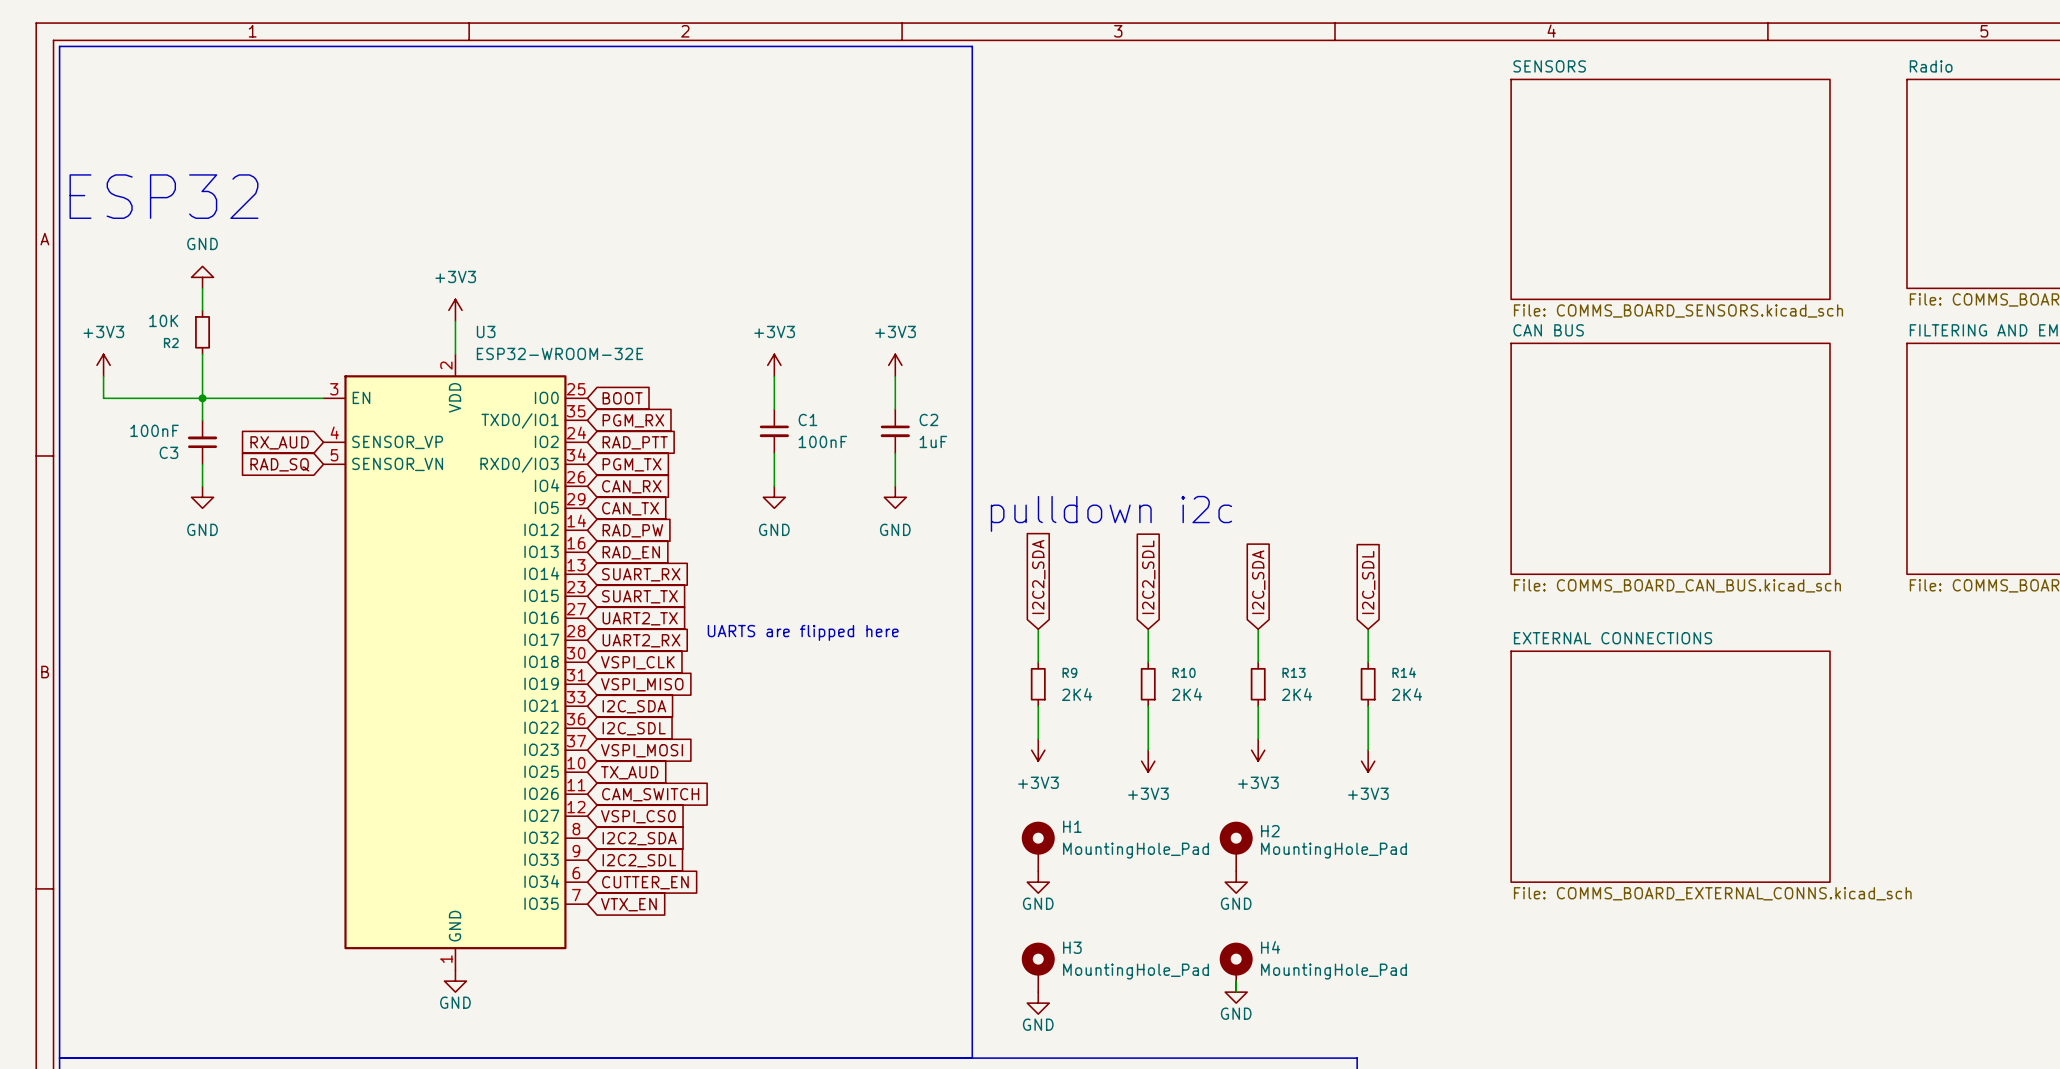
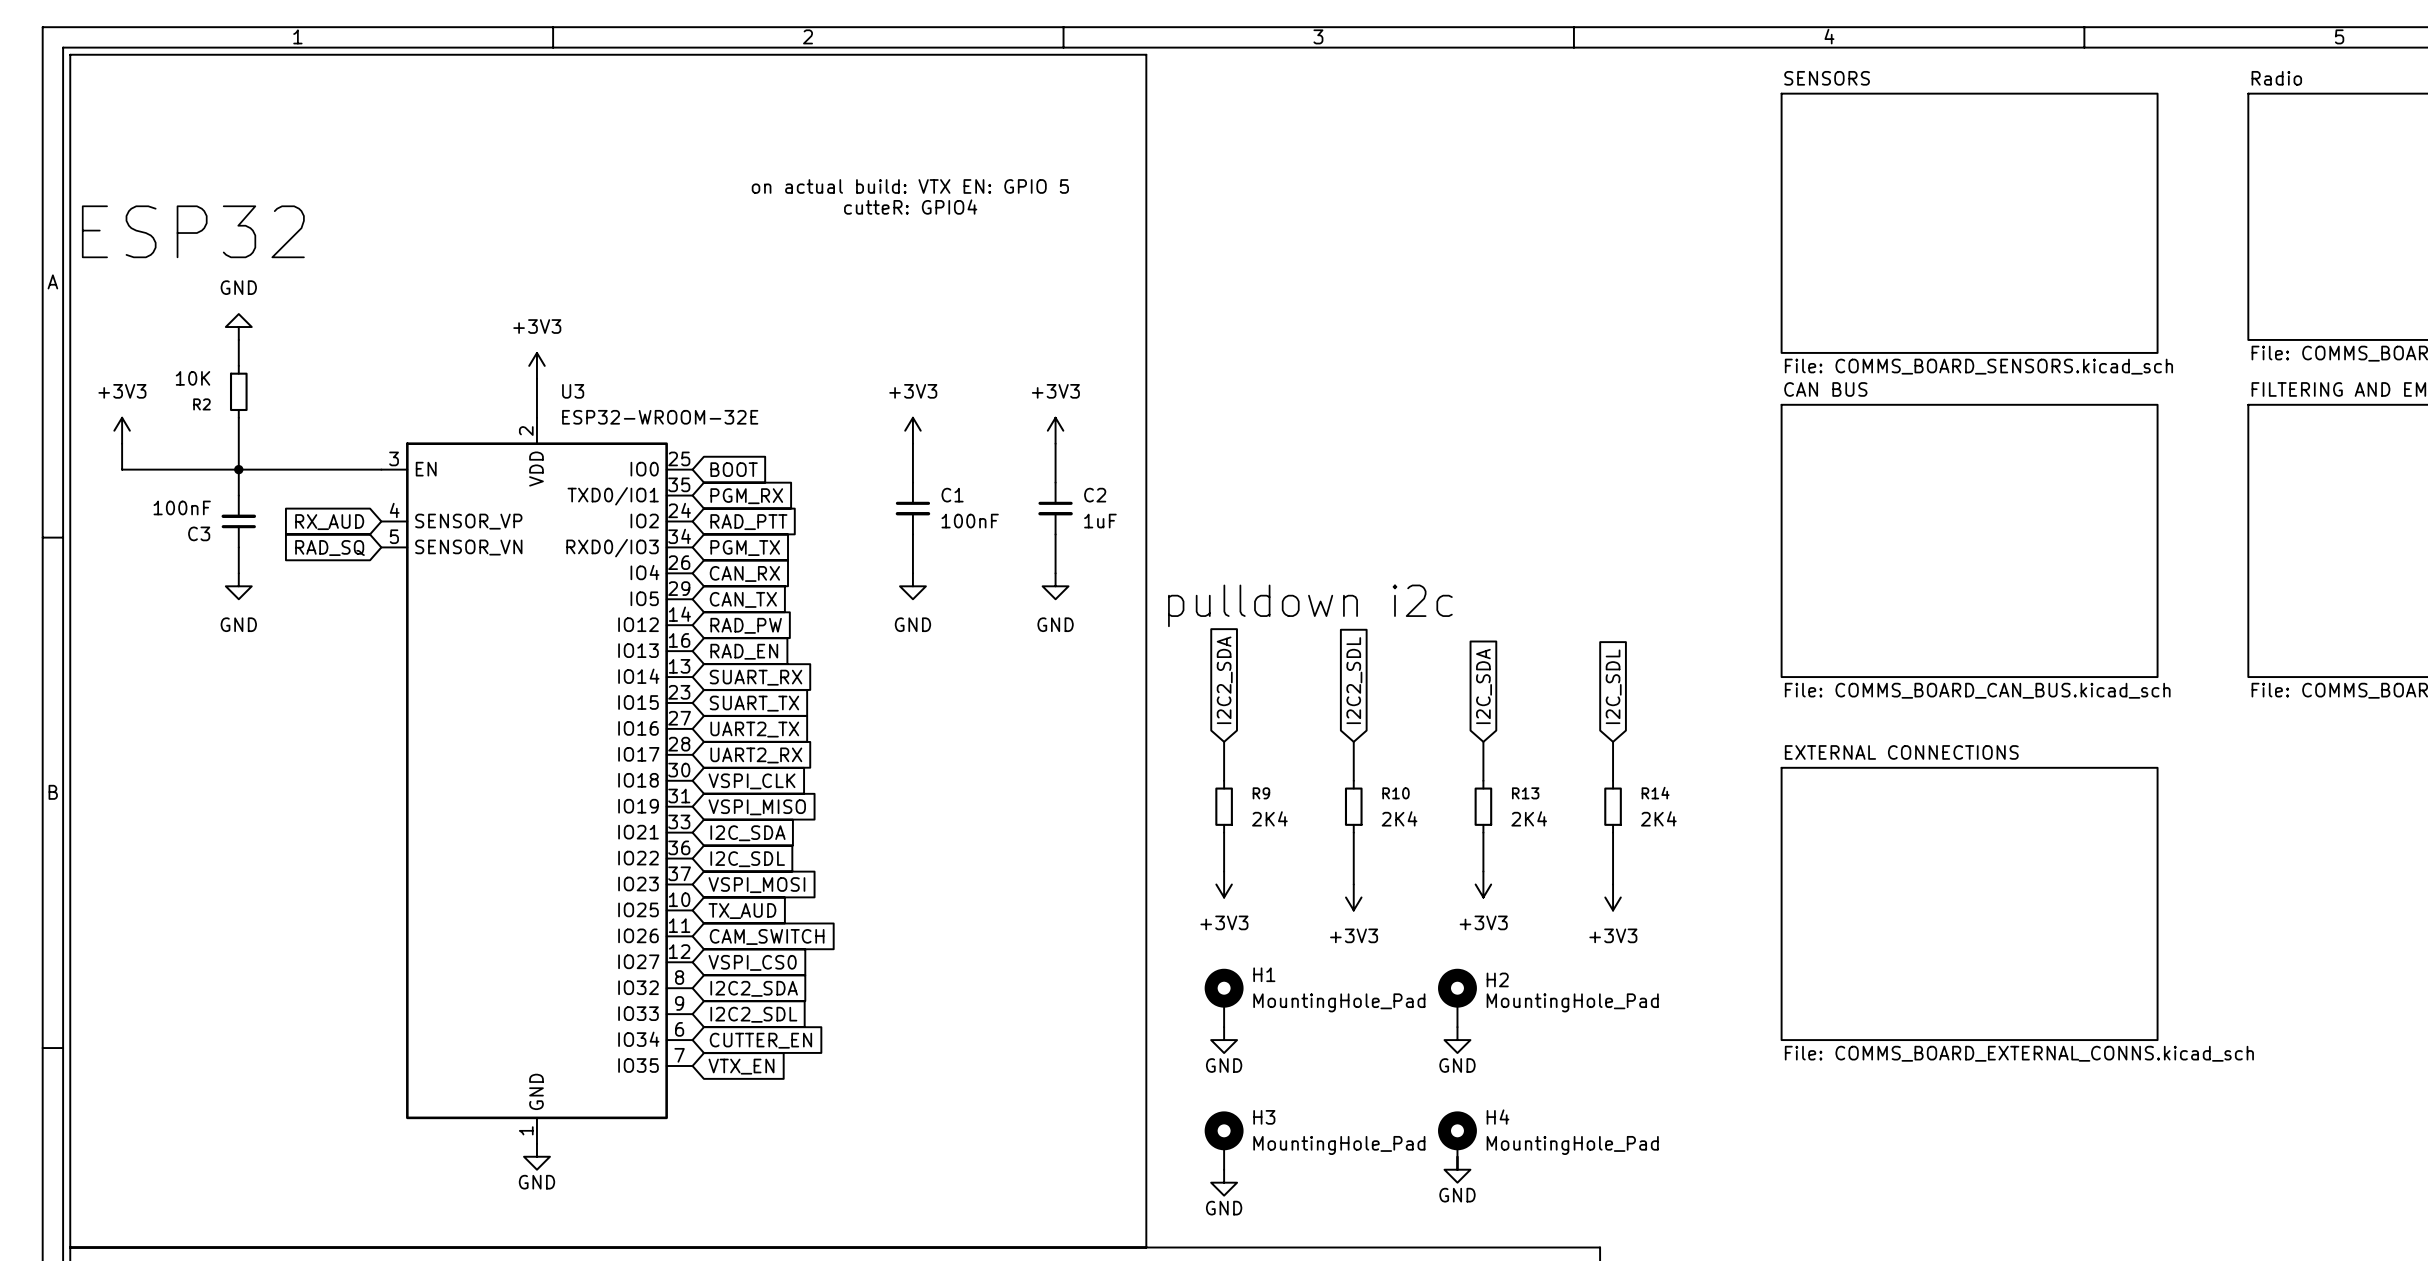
text: none -> on actual build: VTX EN: GPIO 5 (910, 186)
text: none -> cutteR: GPIO4 (910, 207)
text: UARTS are flipped here (803, 632) -> none

